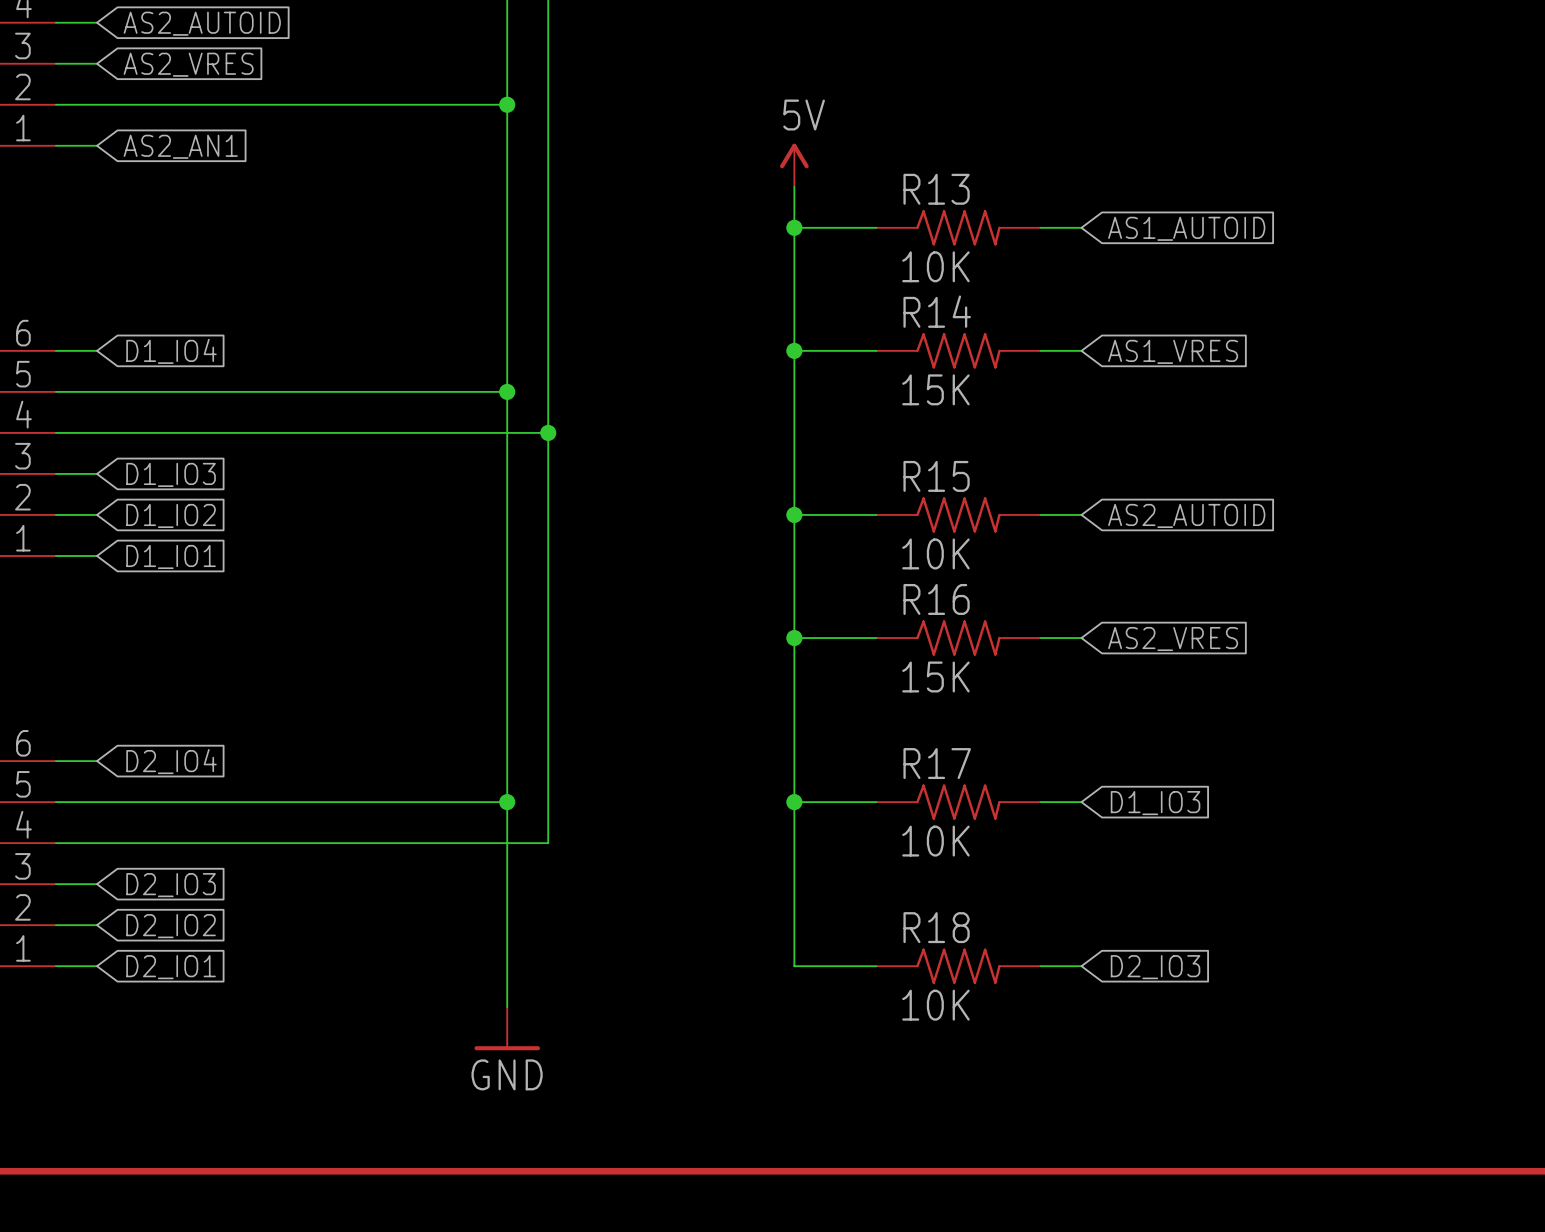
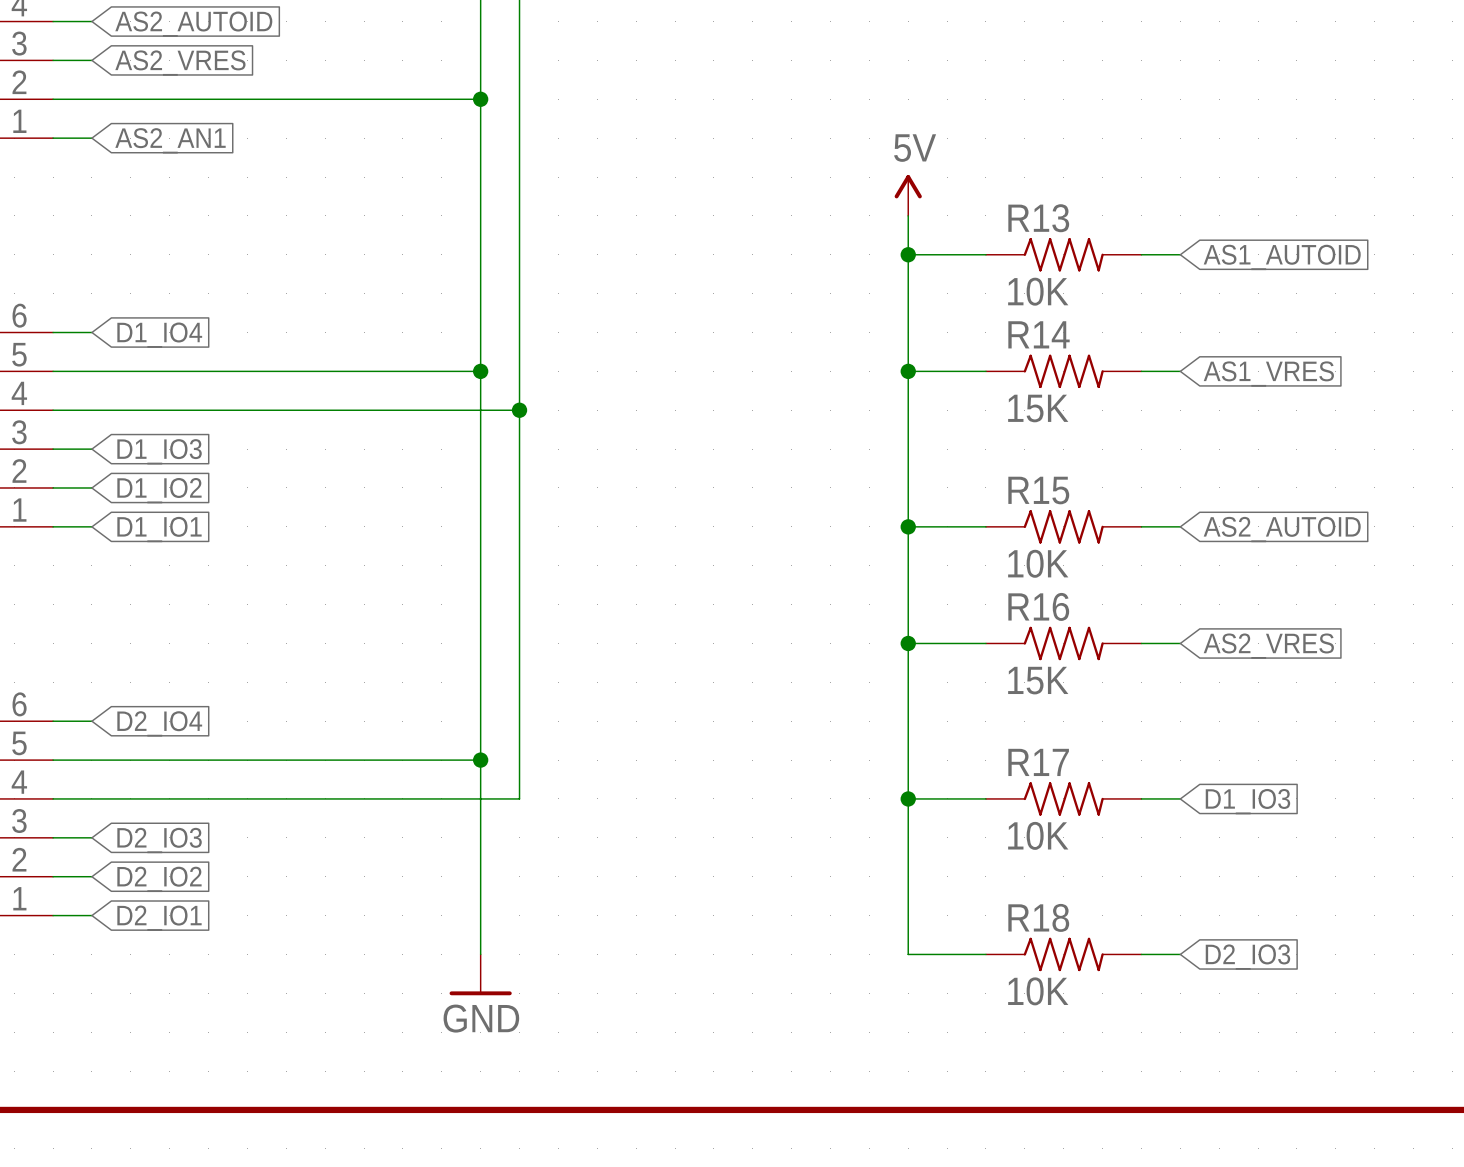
power symbol position: 5V (794, 165) -> 5V (908, 195)
wire: (794, 186) (794, 966) (876, 966) -> (908, 215) (908, 954) (985, 954)
wire: (794, 227) (876, 227) -> (908, 254) (985, 254)
junction: (794, 227) -> none
R13 position: (958, 227) -> (1063, 254)
wire: (1040, 227) (1081, 227) -> (1141, 254) (1180, 254)
global label position: AS1_AUTOID (1186, 228) -> AS1_AUTOID (1282, 257)
junction: none -> (908, 254)
wire: (794, 350) (876, 350) -> (908, 371) (985, 371)
junction: (794, 350) -> none
R14 position: (958, 350) -> (1063, 371)
wire: (1040, 350) (1081, 350) -> (1141, 371) (1180, 371)
global label position: AS1_VRES (1173, 351) -> AS1_VRES (1268, 374)
junction: none -> (908, 371)
wire: (794, 514) (876, 514) -> (908, 526) (985, 526)
junction: (794, 514) -> none
R15 position: (958, 514) -> (1063, 526)
wire: (1040, 514) (1081, 514) -> (1141, 526) (1180, 526)
global label position: AS2_AUTOID (1186, 515) -> AS2_AUTOID (1282, 529)
junction: none -> (908, 526)
wire: (794, 638) (876, 638) -> (908, 643) (985, 643)
junction: (794, 638) -> none
R16 position: (958, 638) -> (1063, 643)
wire: (1040, 638) (1081, 638) -> (1141, 643) (1180, 643)
global label position: AS2_VRES (1173, 639) -> AS2_VRES (1268, 646)
junction: none -> (908, 643)
wire: (794, 802) (876, 802) -> (908, 798) (985, 798)
junction: (794, 802) -> none
R17 position: (958, 802) -> (1063, 798)
wire: (1040, 802) (1081, 802) -> (1141, 798) (1180, 798)
global label position: D1_IO3 (1155, 803) -> D1_IO3 (1247, 801)
junction: none -> (908, 798)
R18 position: (958, 966) -> (1063, 954)
wire: (1040, 966) (1081, 966) -> (1141, 954) (1180, 954)
global label position: D2_IO3 (1155, 967) -> D2_IO3 (1247, 957)

